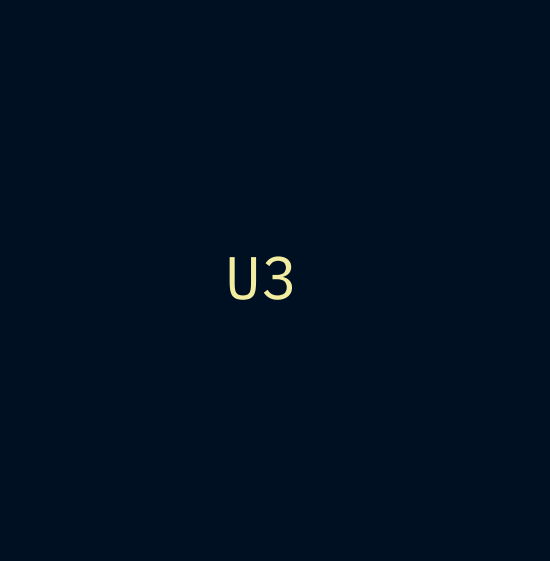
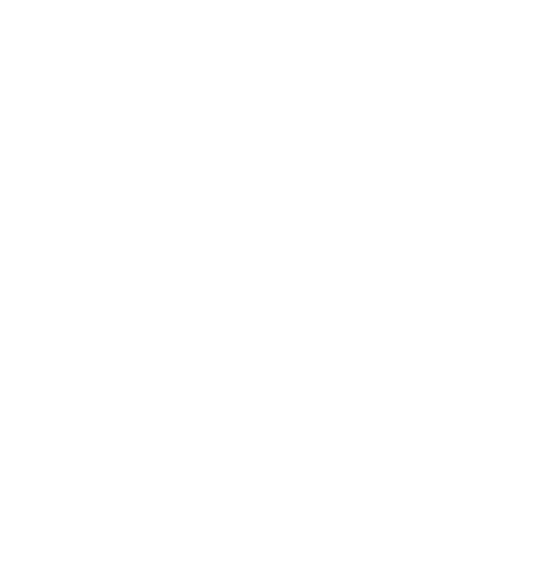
U3: (260, 278) -> none

